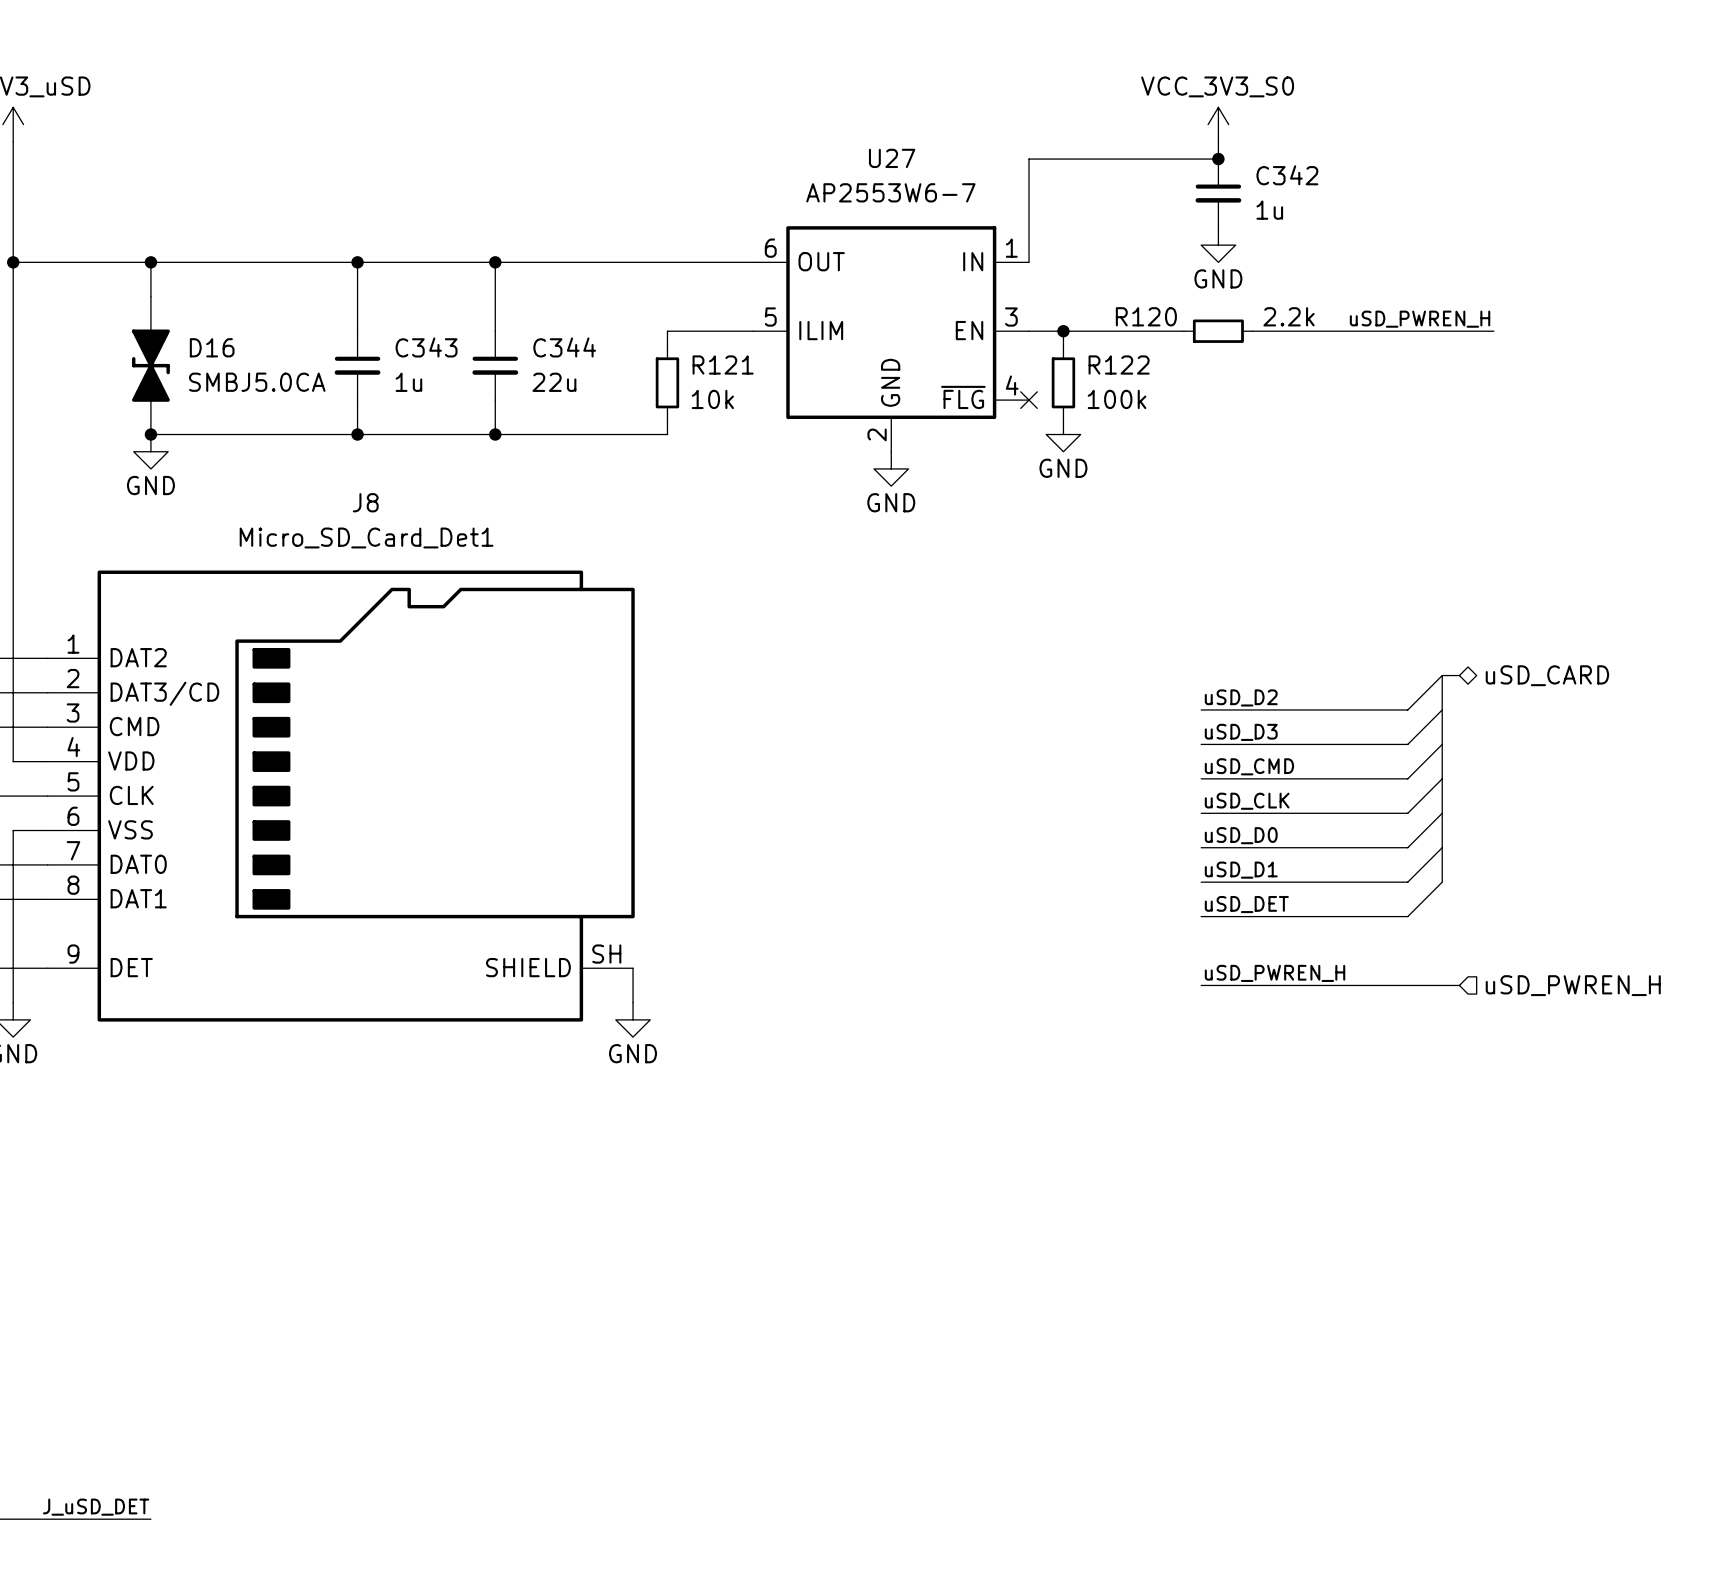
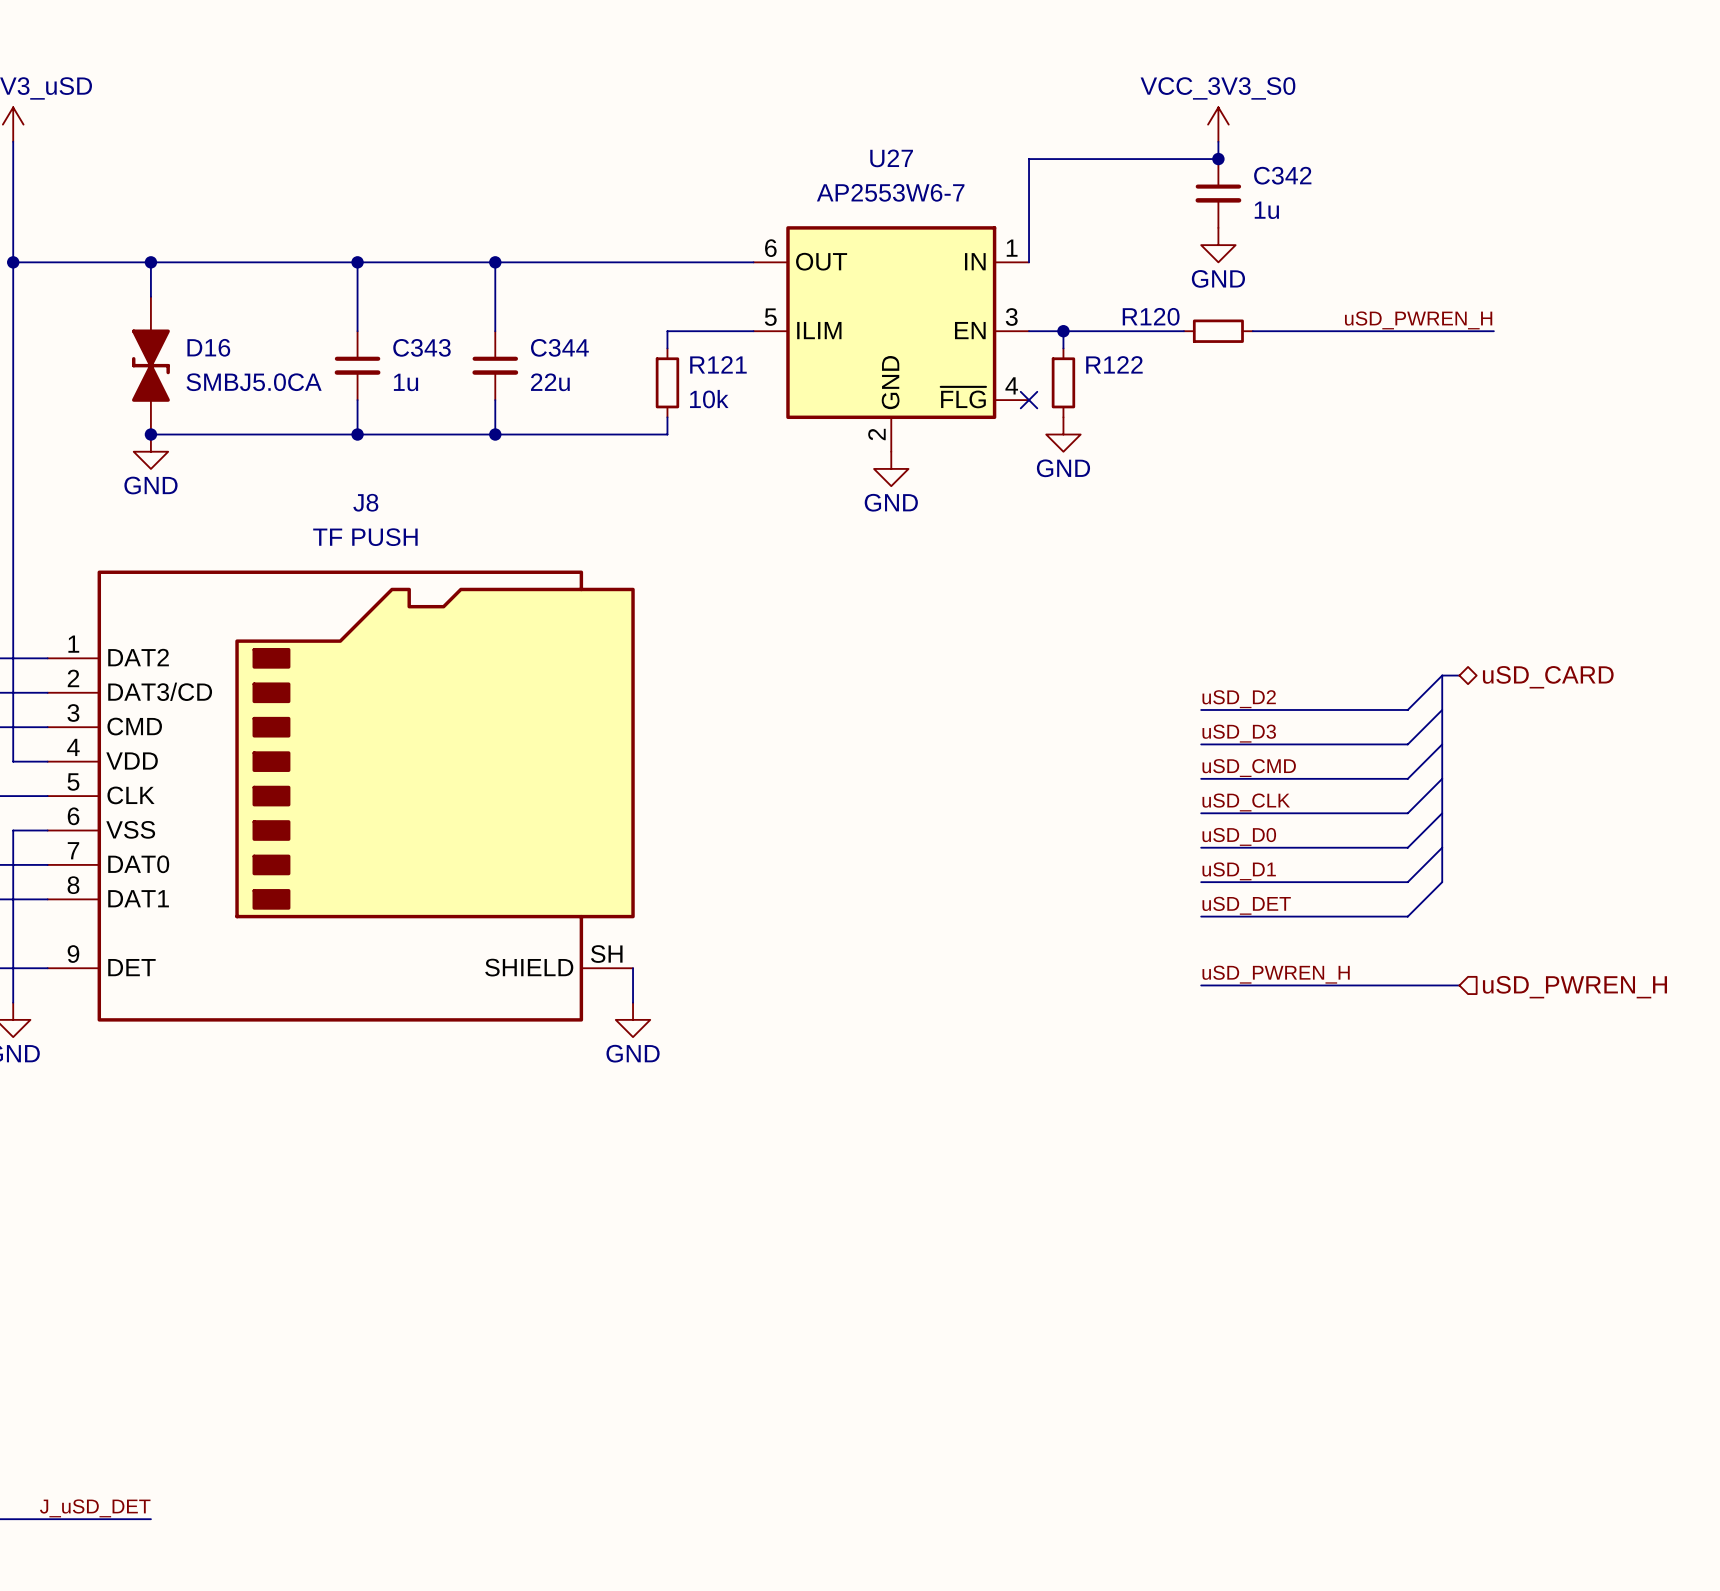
R120 value: 2.2k (1289, 316) -> none
R122 value: 100k (1117, 399) -> none
J8 value: Micro_SD_Card_Det1 (366, 537) -> TF PUSH (365, 537)

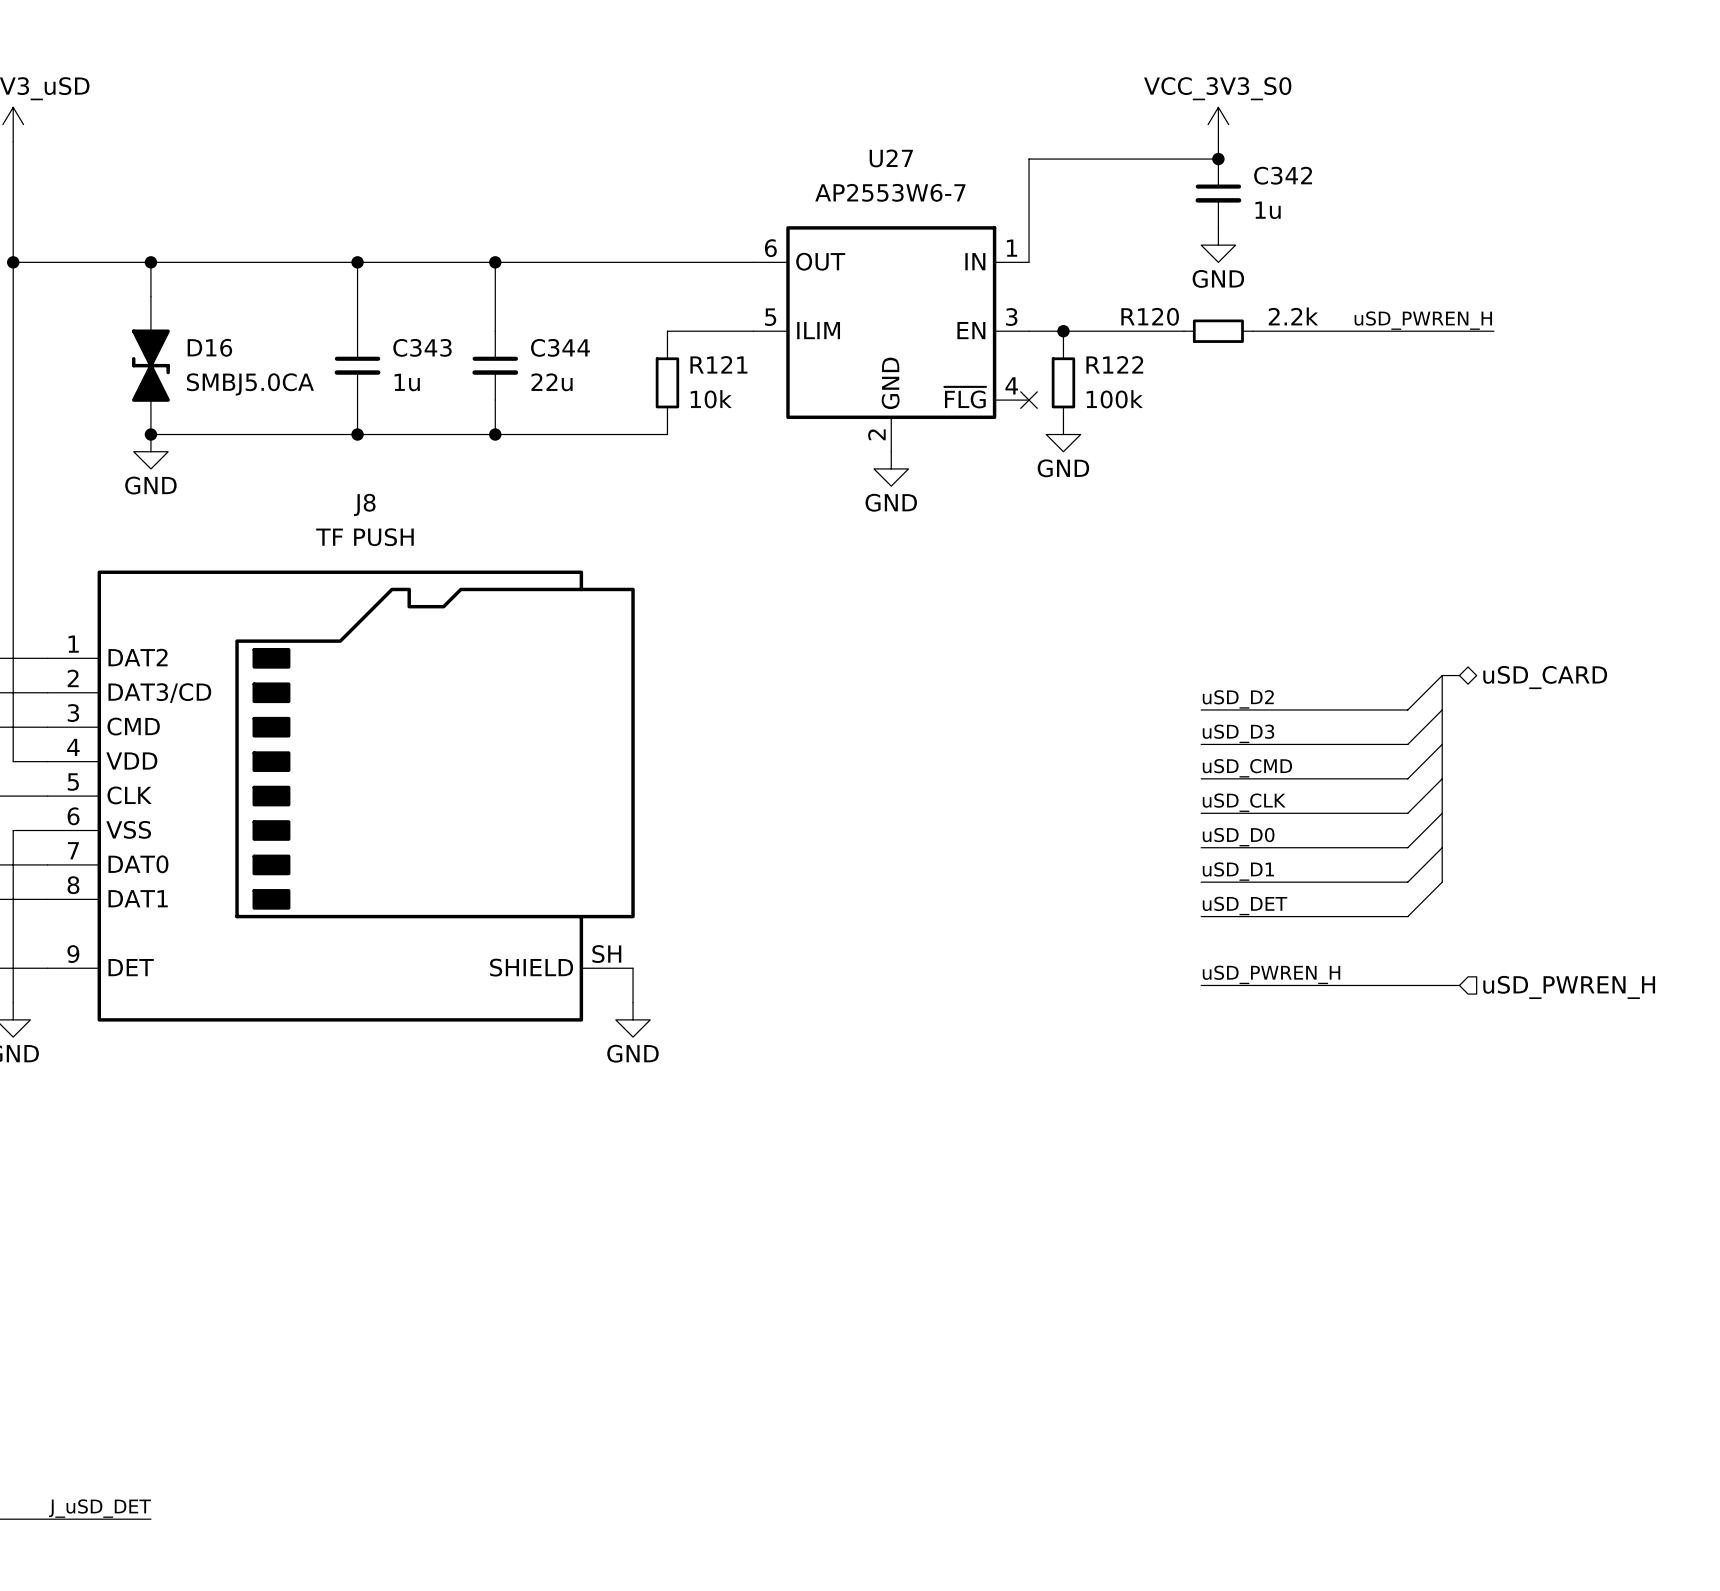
R120 value: none -> 2.2k (1293, 316)
R122 value: none -> 100k (1114, 399)

